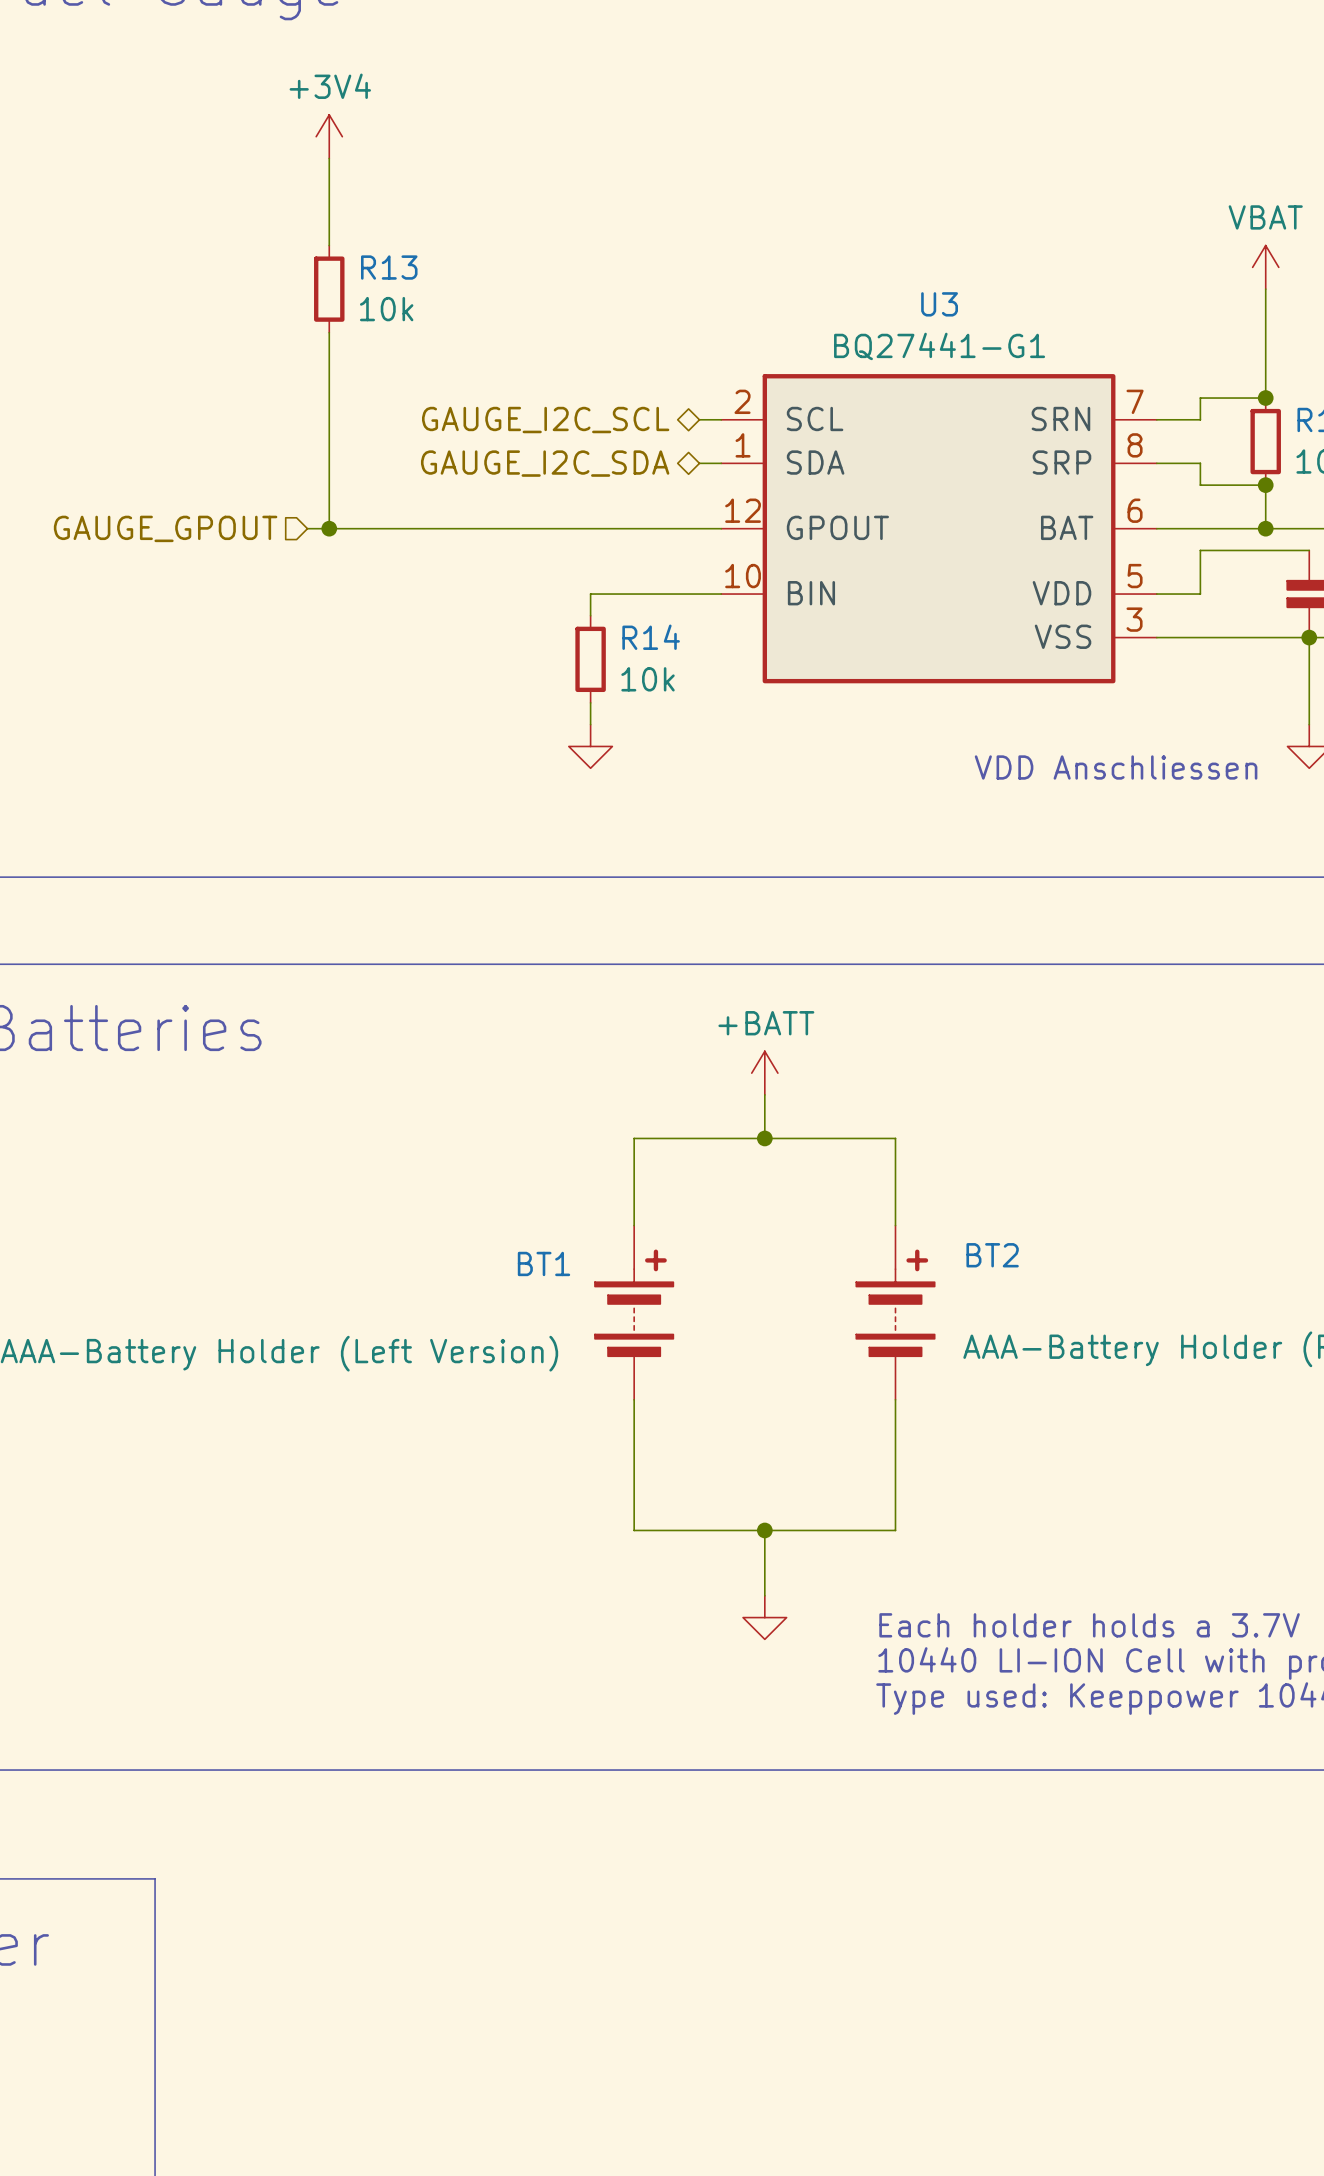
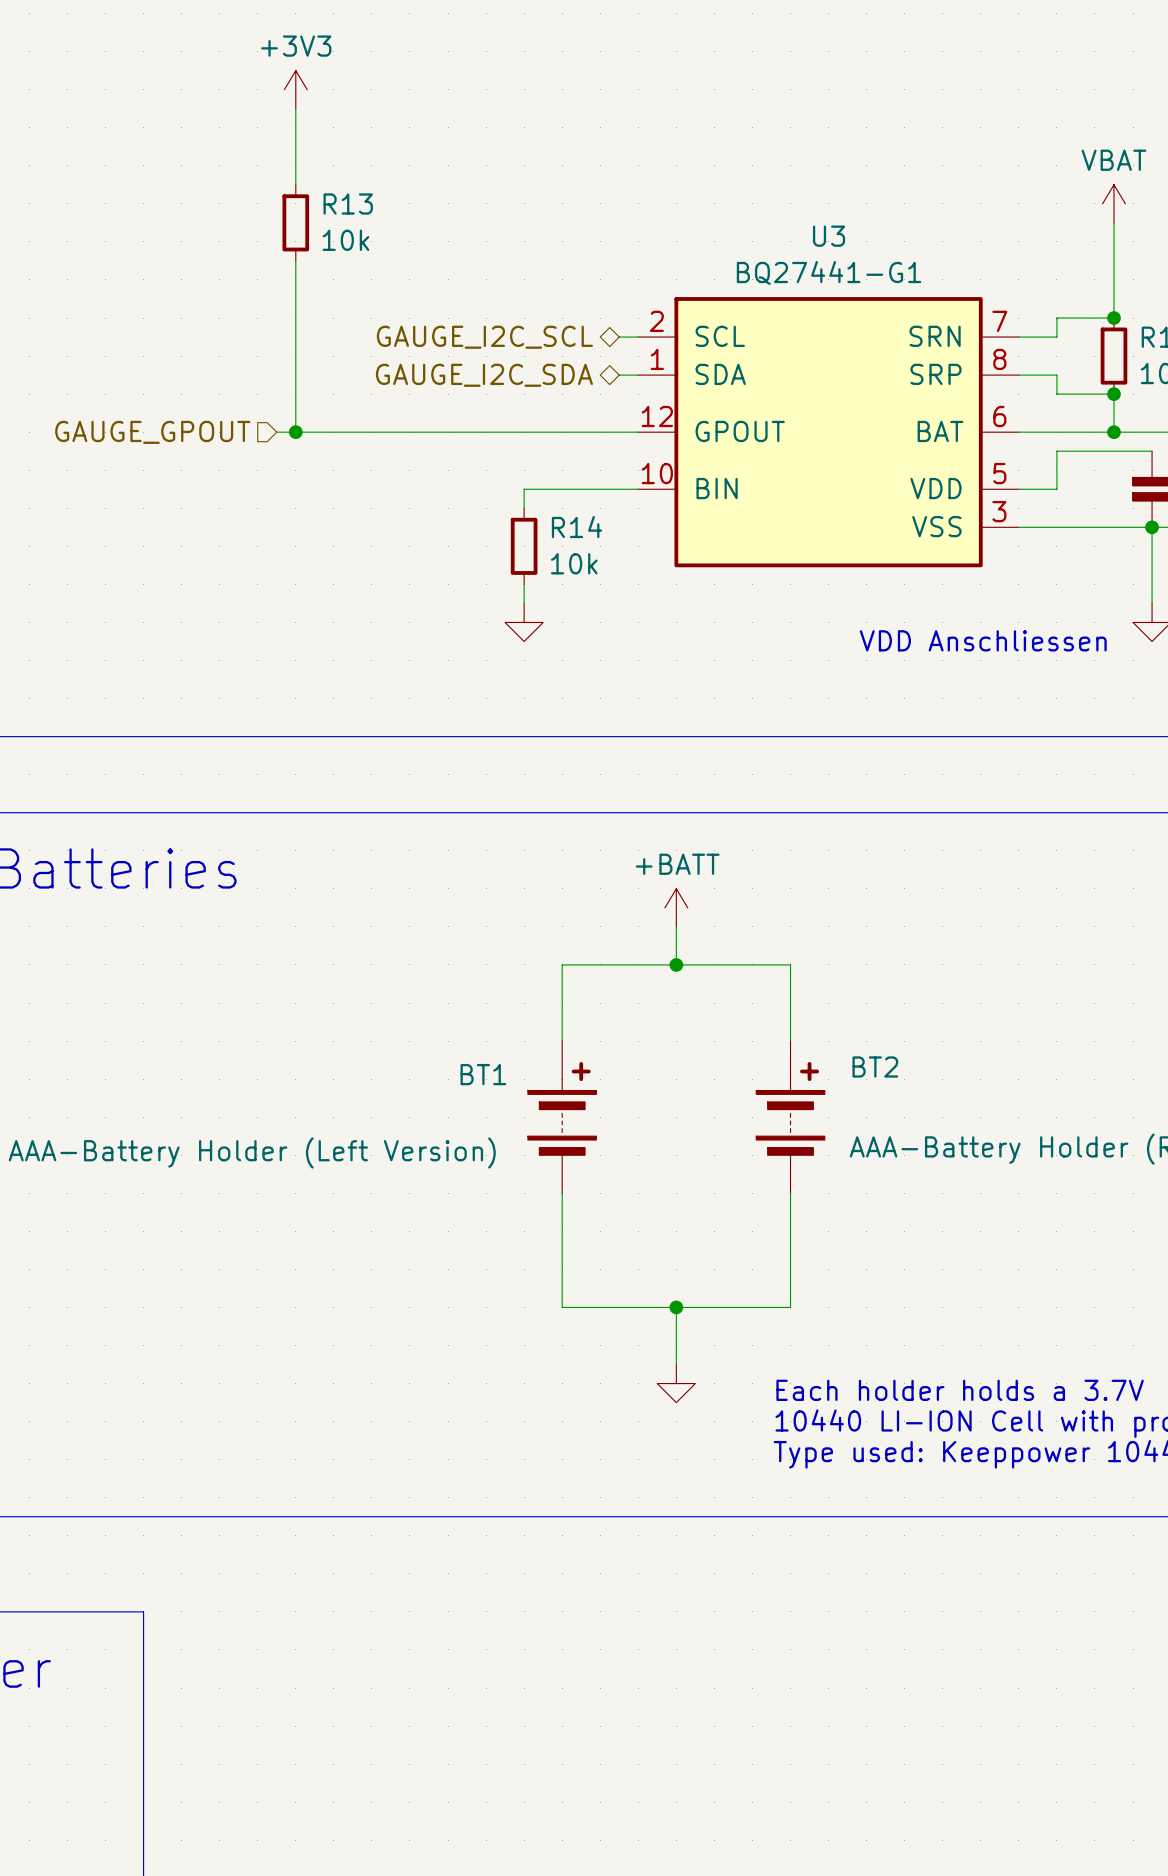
power symbol: +3V4 (329, 136) -> +3V3 (295, 89)

